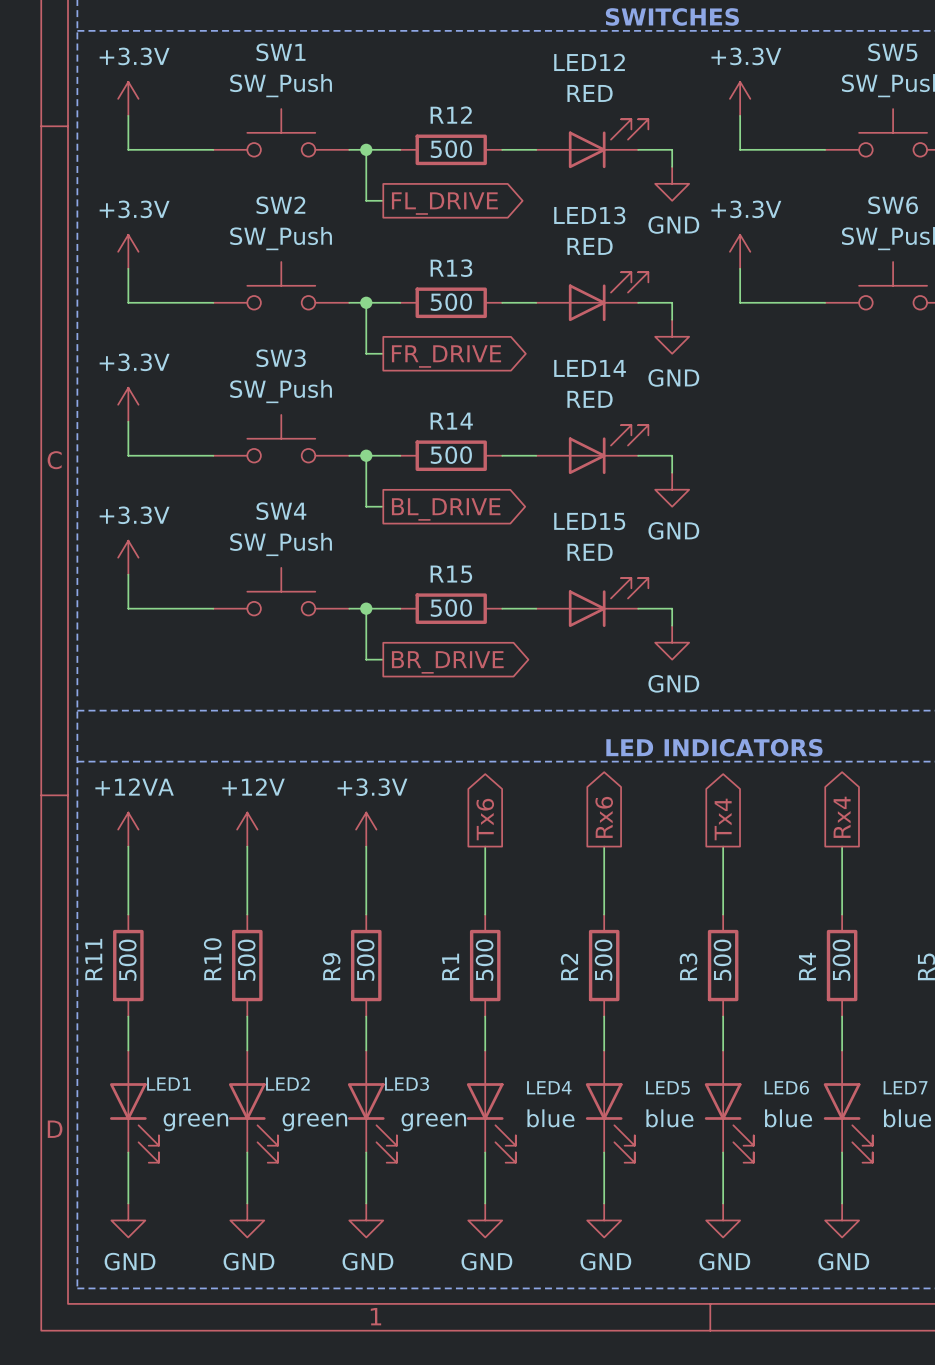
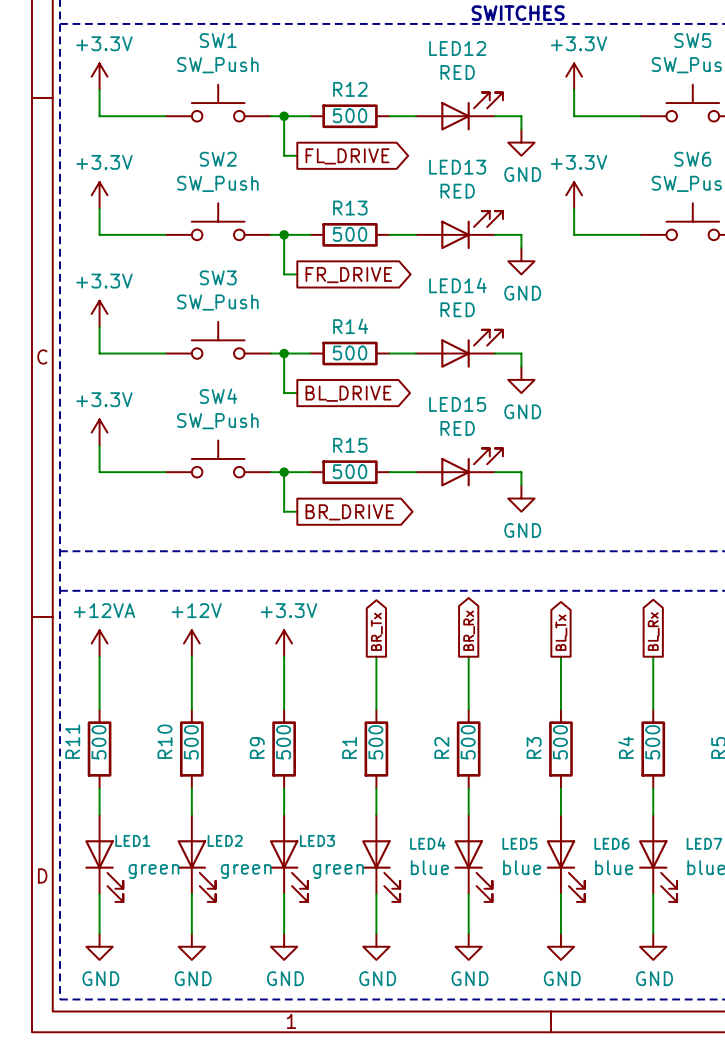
text: LED INDICATORS (714, 747) -> none
global label: Rx6 (604, 817) -> BR_Rx (469, 630)
global label: Rx4 (842, 817) -> BL_Rx (653, 631)
global label: Tx6 (485, 819) -> BR_Tx (376, 631)
global label: Tx4 (723, 819) -> BL_Tx (561, 632)

